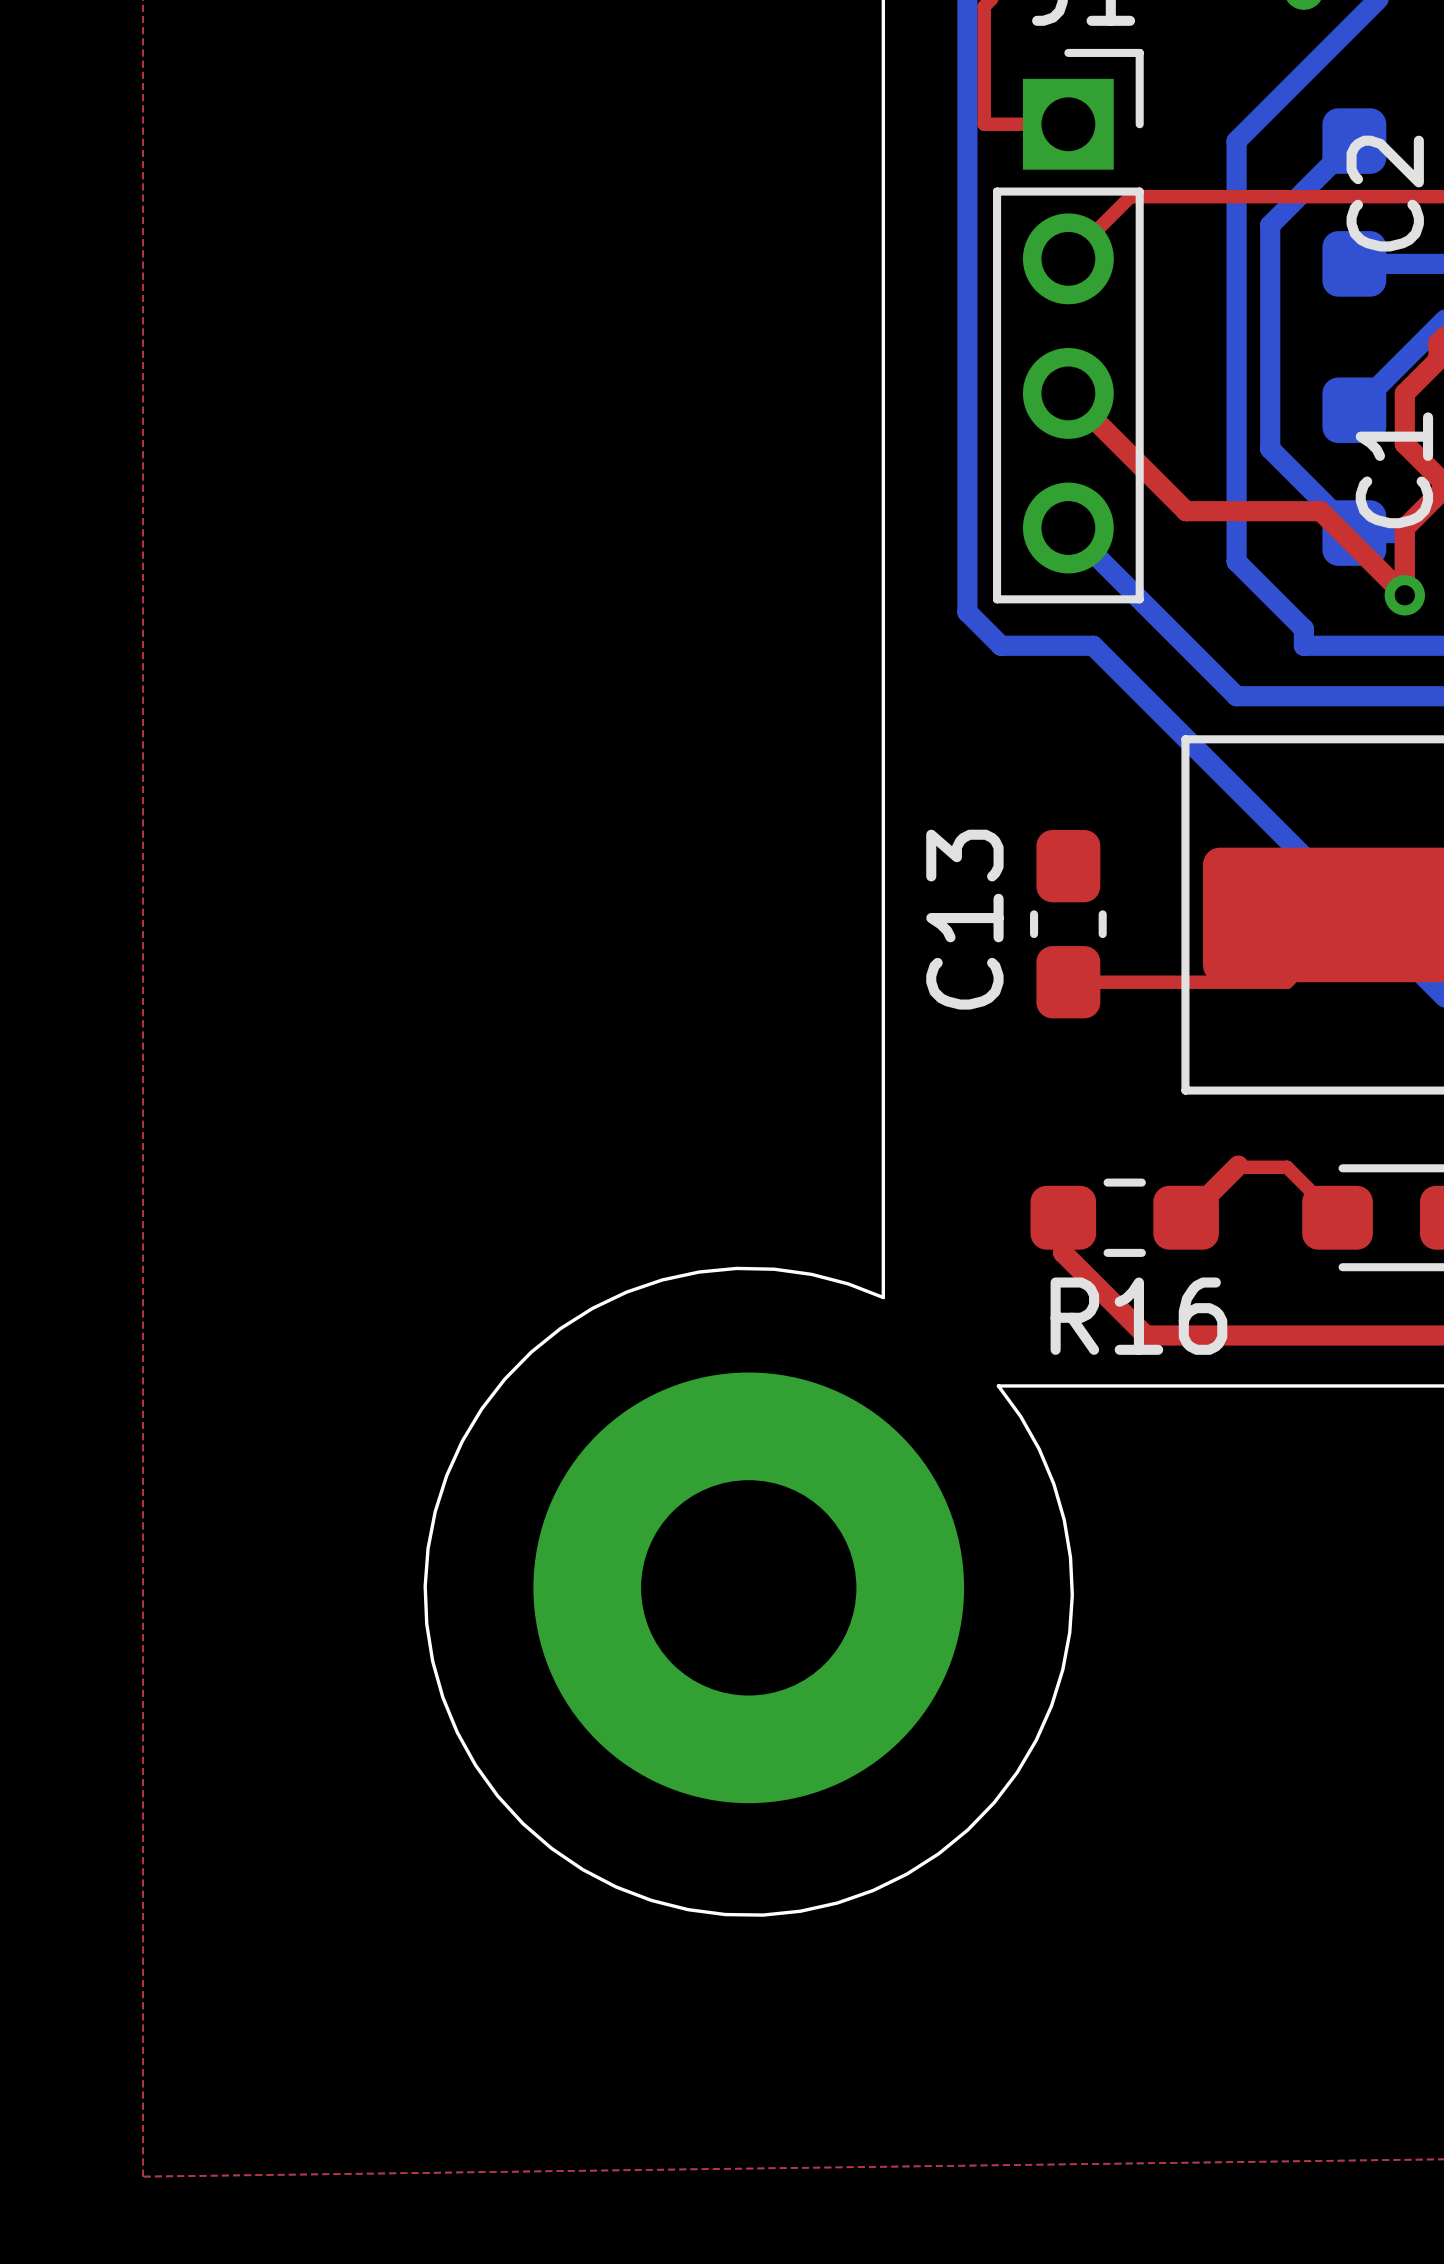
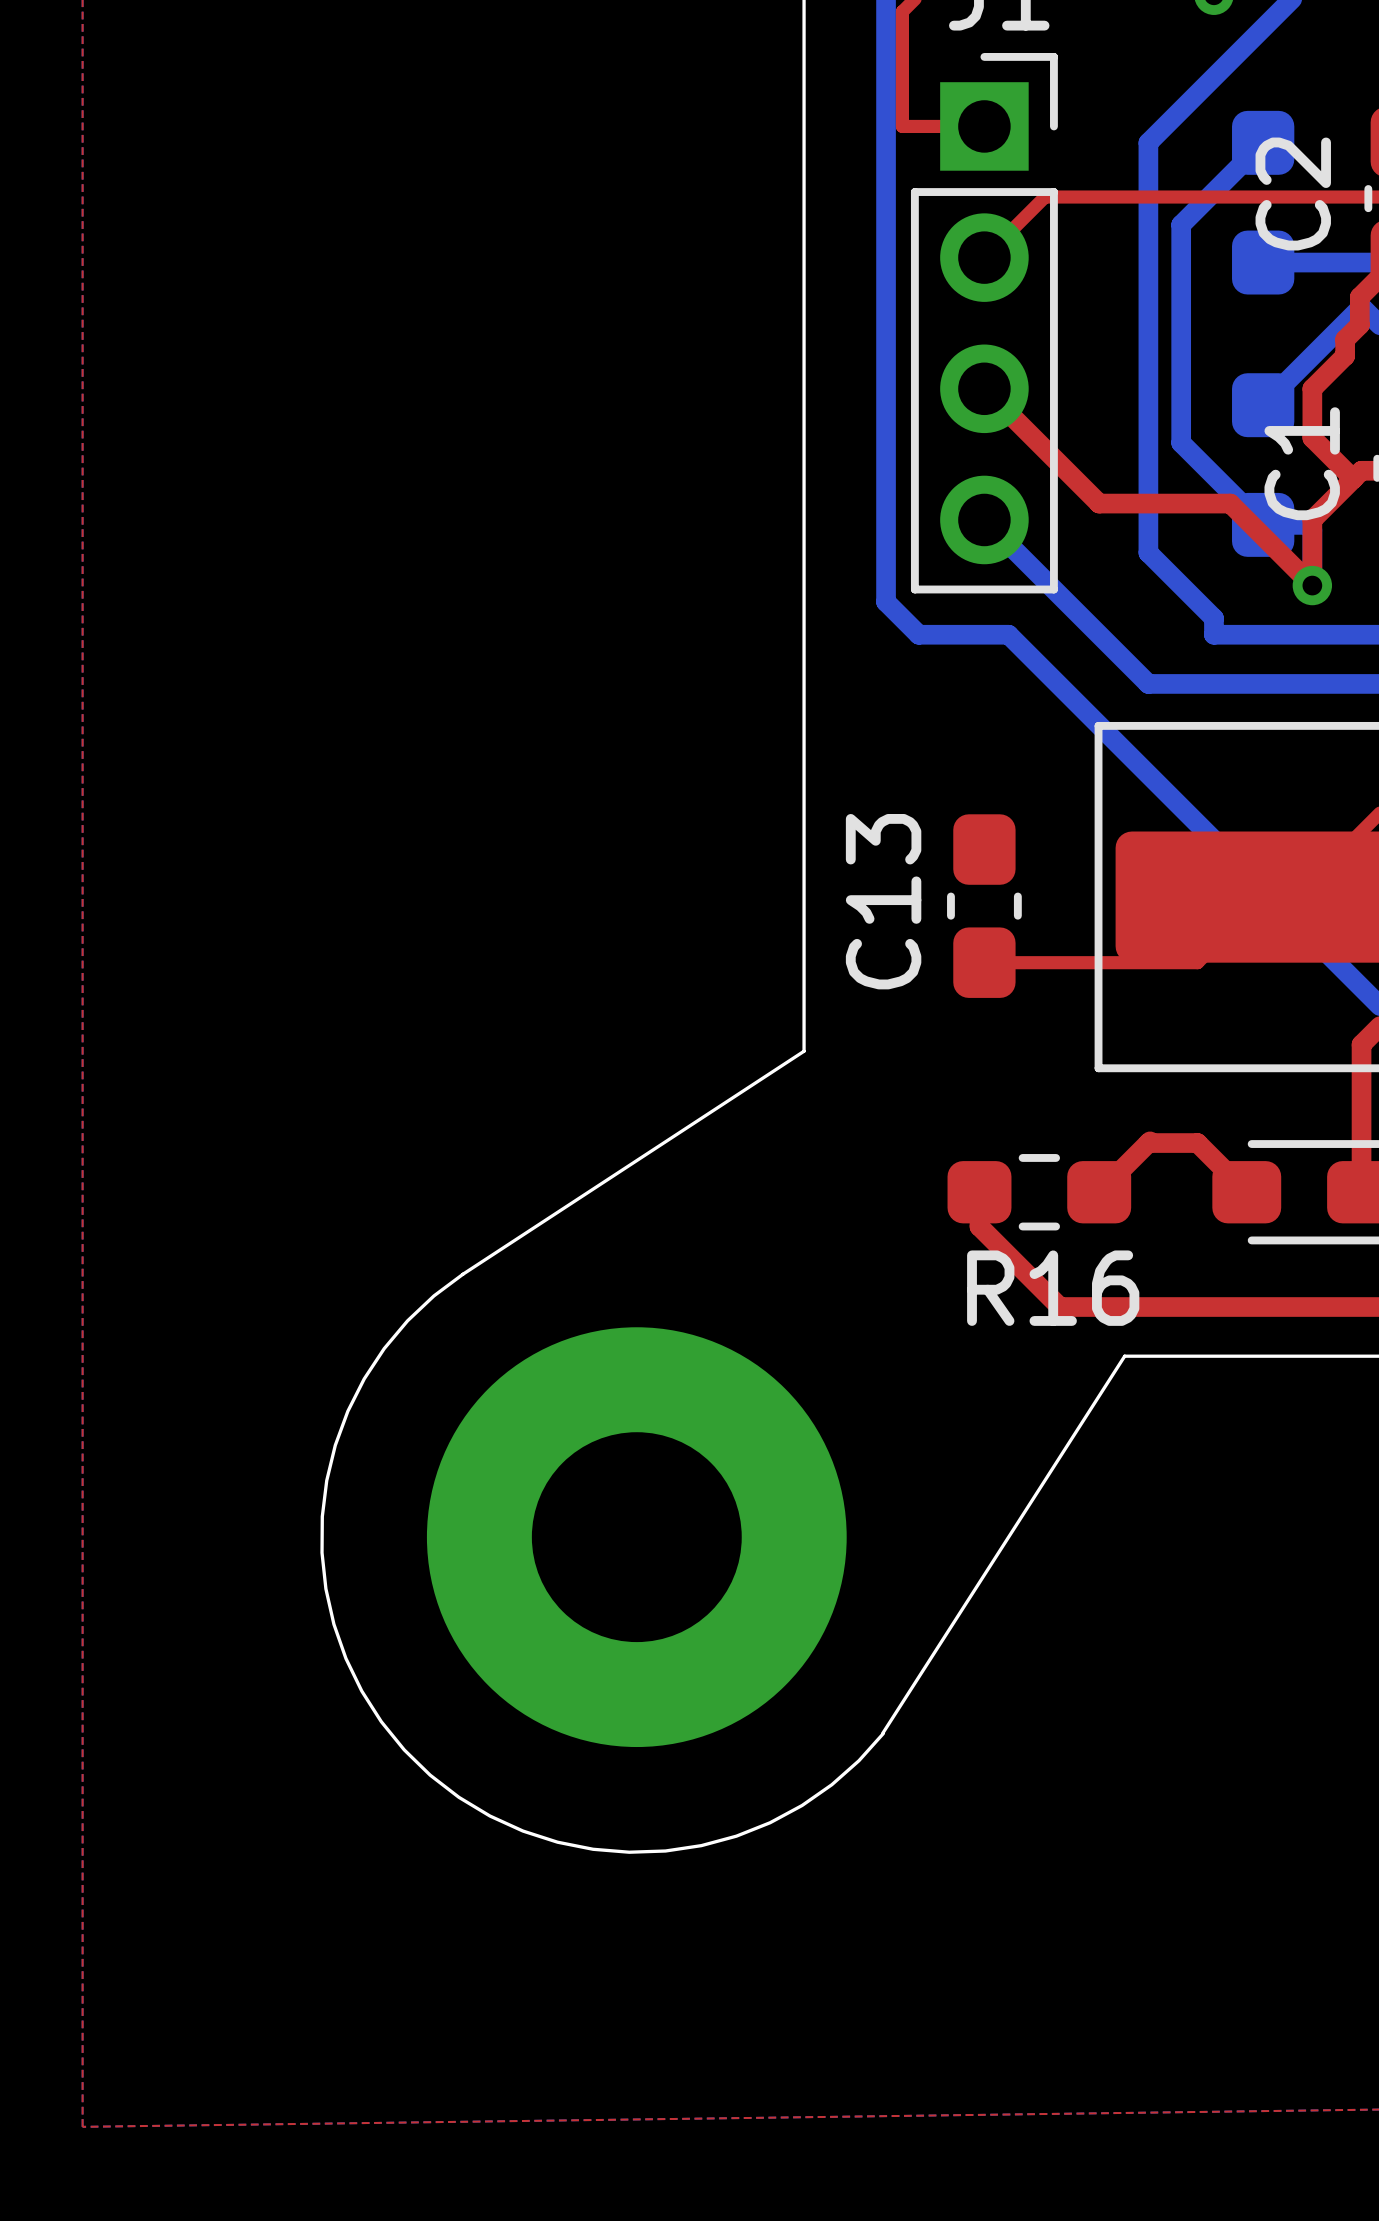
board edge: (883, 1073) (883, 1297) (848, 1283) (811, 1274) (774, 1269) (736, 1268) (699, 1272) (662, 1280) (626, 1292) (592, 1308) (560, 1328) (531, 1352) (504, 1379) (481, 1408) (462, 1441) (446, 1475) (435, 1511) (428, 1548) (425, 1586) (426, 1623) (432, 1661) (442, 1697) (457, 1732) (475, 1765) (497, 1795) (523, 1823) (551, 1848) (582, 1869) (616, 1887) (651, 1900) (688, 1909) (725, 1914) (763, 1915) (800, 1911) (837, 1902) (873, 1890) (906, 1874) (938, 1853) (967, 1829) (994, 1802) (1017, 1772) (1036, 1740) (1051, 1705) (1062, 1669) (1069, 1632) (1072, 1595) (1070, 1557) (1064, 1520) (1053, 1484) (1039, 1449) (1020, 1416) (998, 1385) (1212, 1385) -> (804, 1051) (463, 1274) (433, 1295) (407, 1320) (384, 1348) (364, 1378) (347, 1411) (335, 1445) (326, 1480) (322, 1516) (322, 1552) (325, 1588) (333, 1624) (345, 1658) (361, 1691) (381, 1721) (404, 1749) (430, 1775) (458, 1797) (490, 1816) (523, 1831) (557, 1842) (593, 1849) (629, 1852) (665, 1851) (701, 1845) (736, 1836) (770, 1822) (802, 1805) (831, 1784) (858, 1760) (883, 1733)
top track width: thin (1240, 1167) (1287, 1167) (1337, 1217) -> thick (1151, 1143) (1197, 1143) (1246, 1192)
board edge: none -> (1124, 1356) (882, 1733)
part position: (748, 1587) -> (636, 1537)

